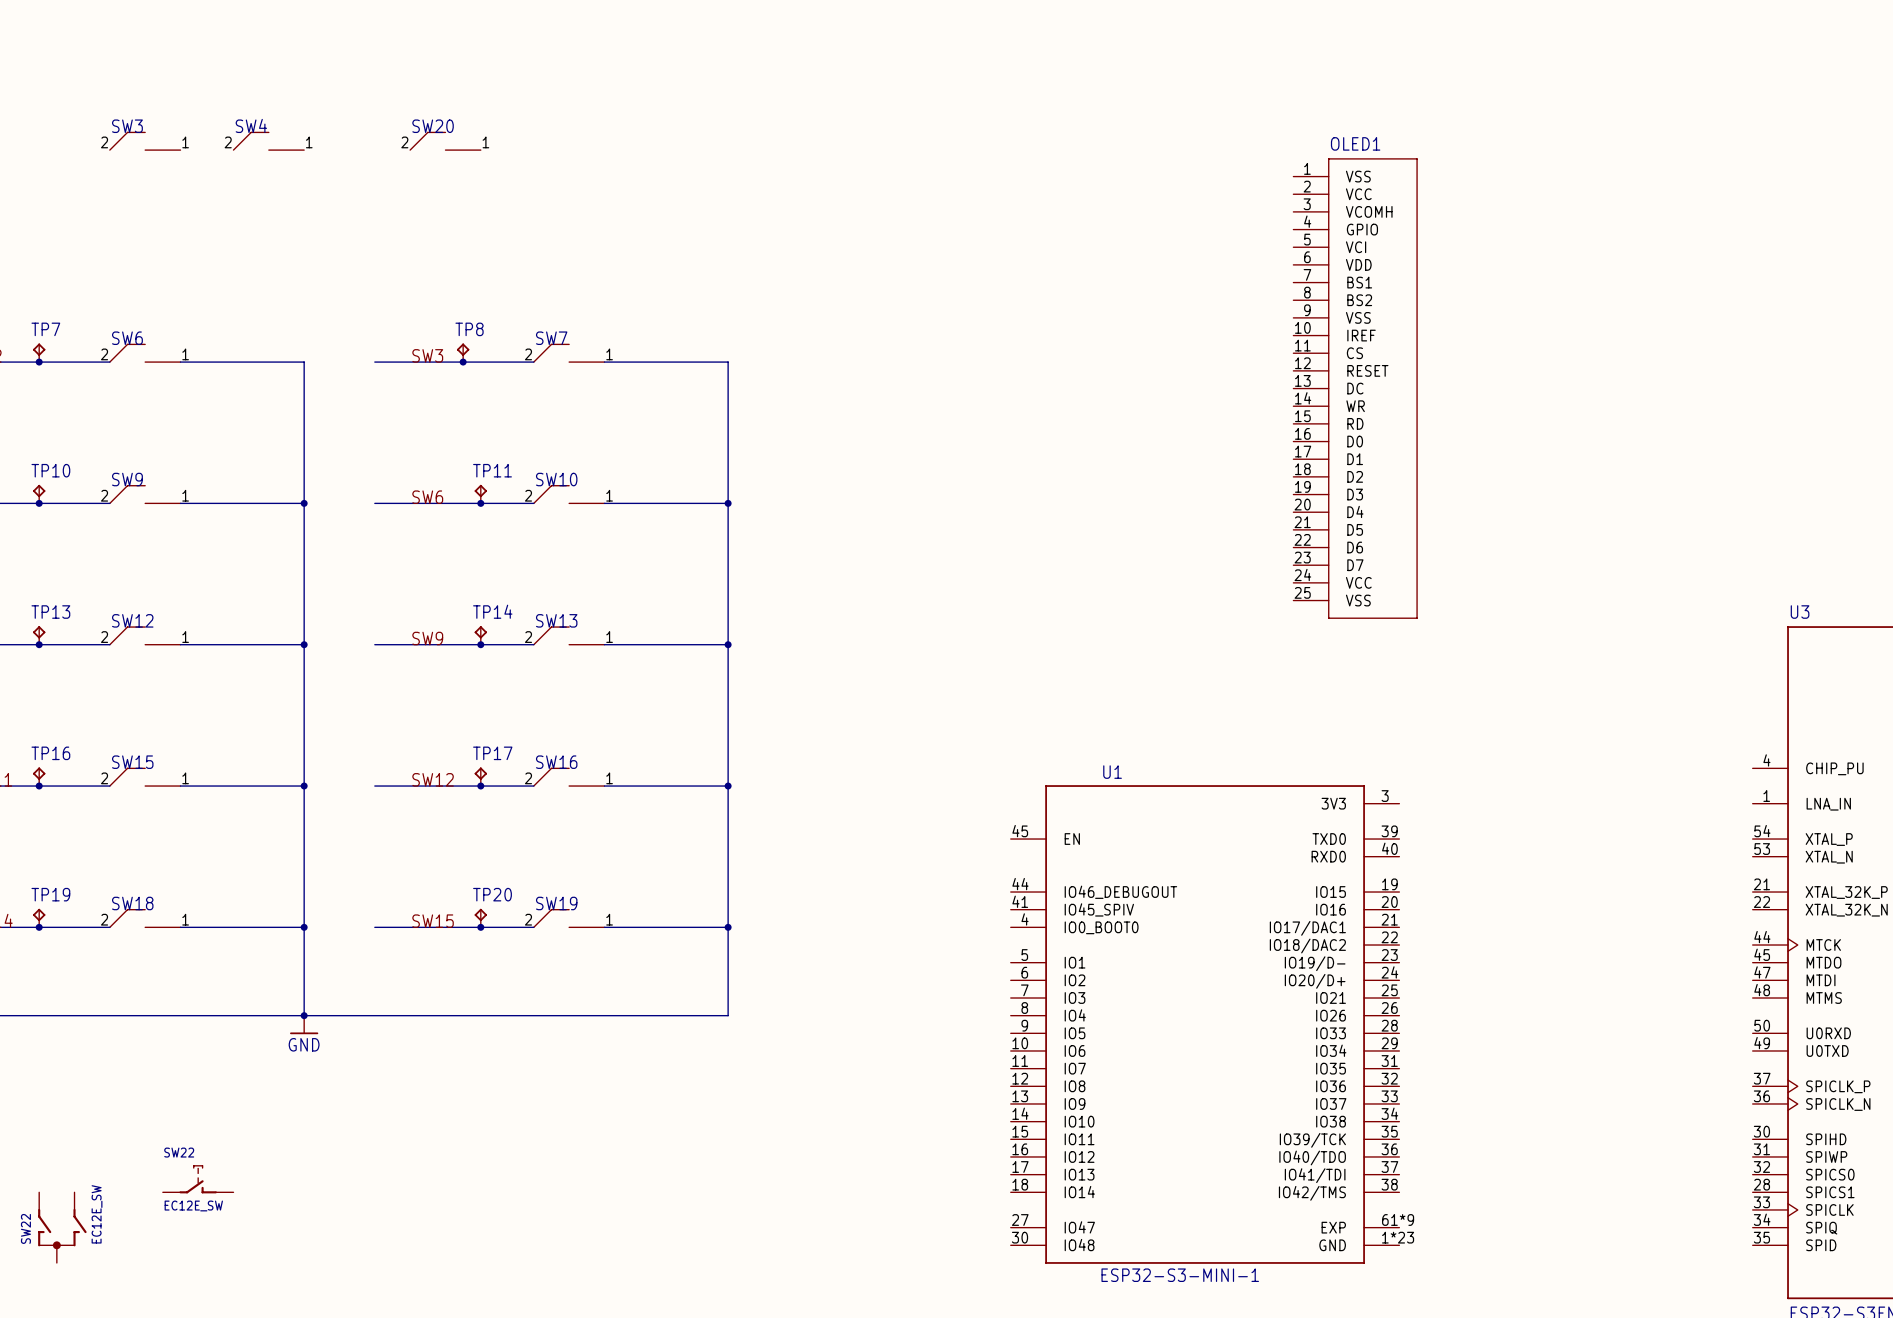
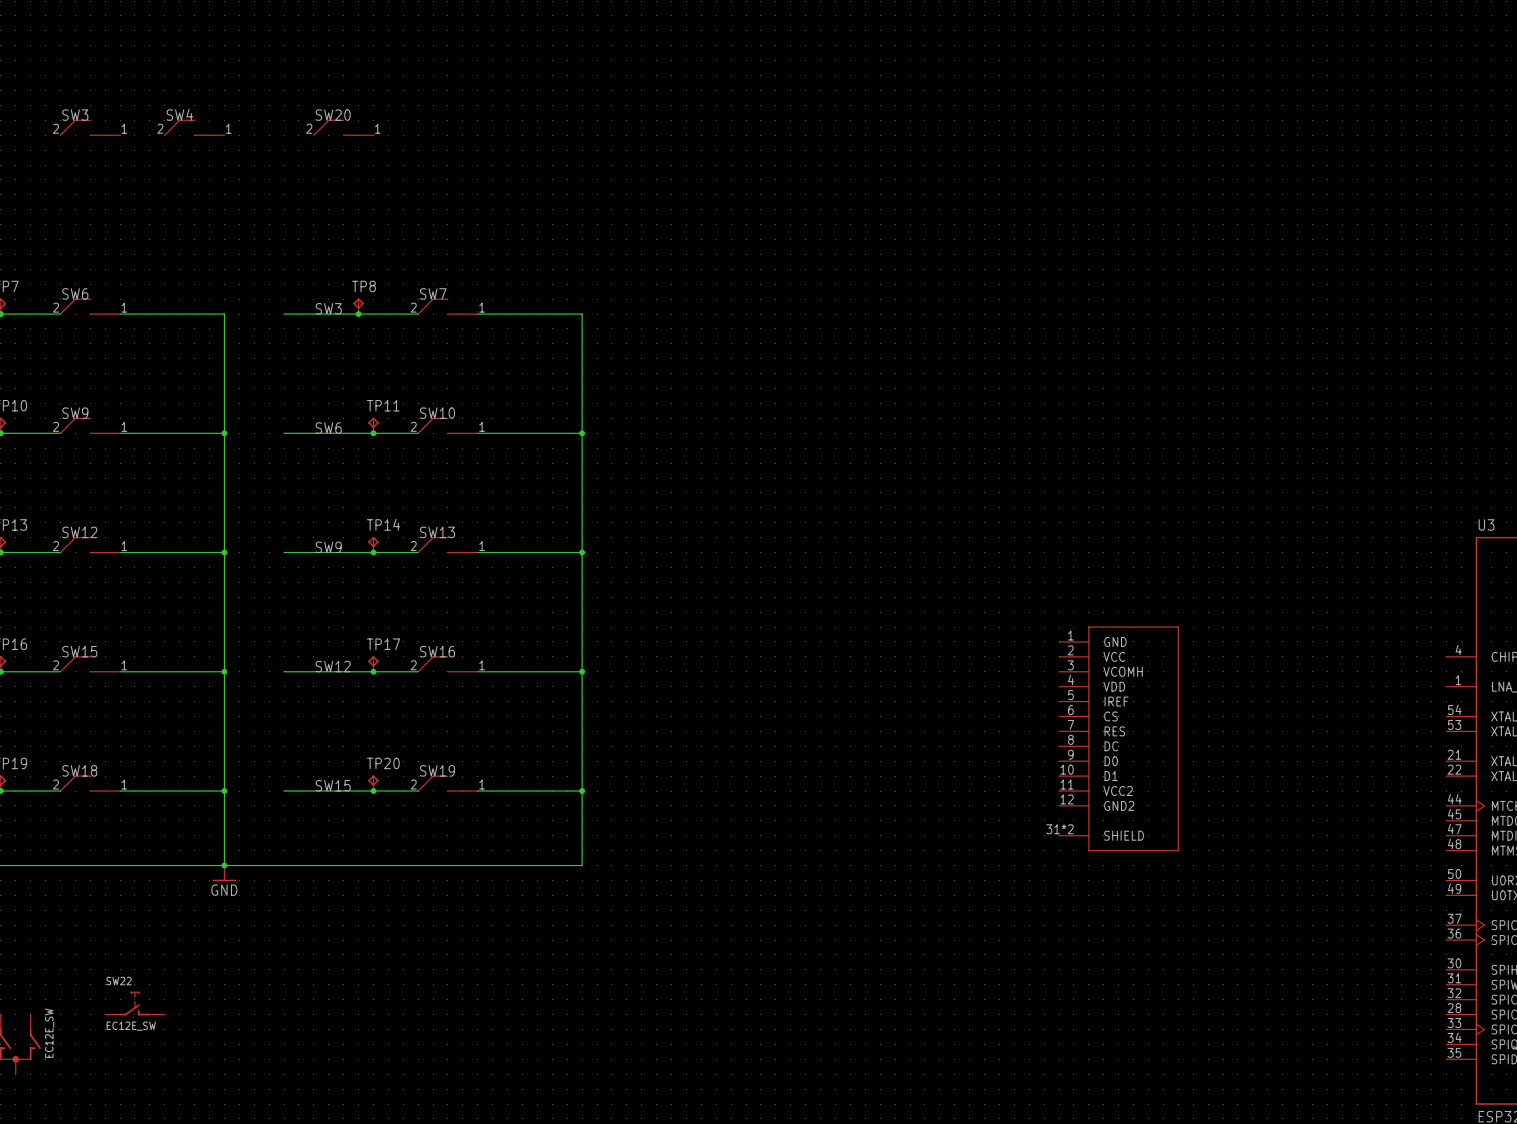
OLED1: (1355, 388) -> none
part: none -> (1118, 738)
U1: ESP32-S3-MINI-1 (1205, 1024) -> none

